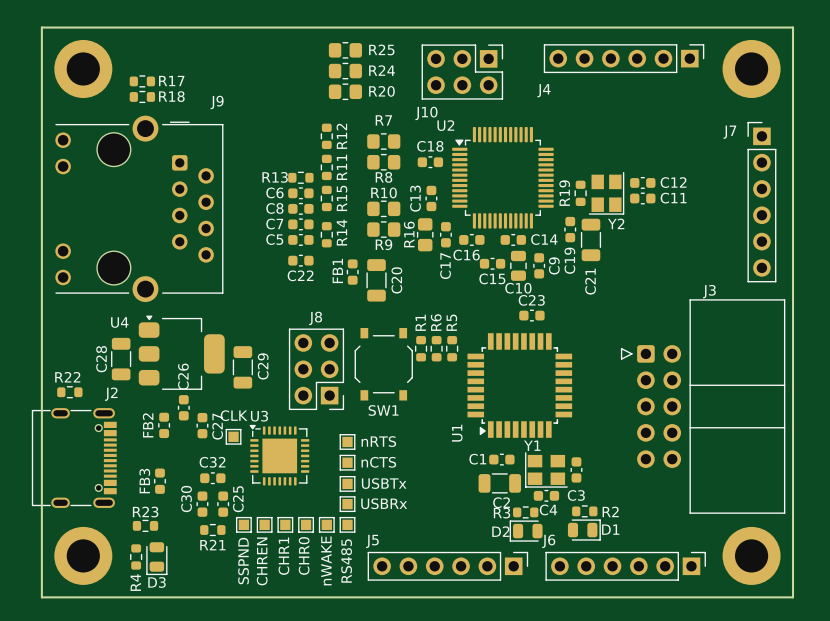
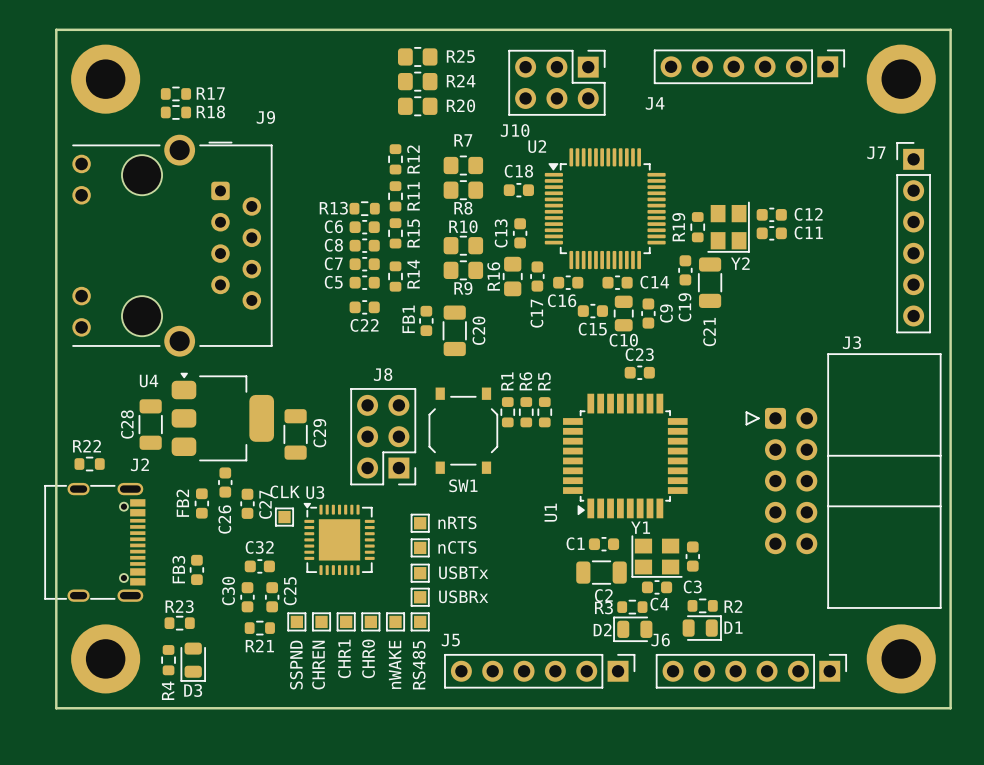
C26 name position: C26 (183, 376) -> C26 (224, 519)

